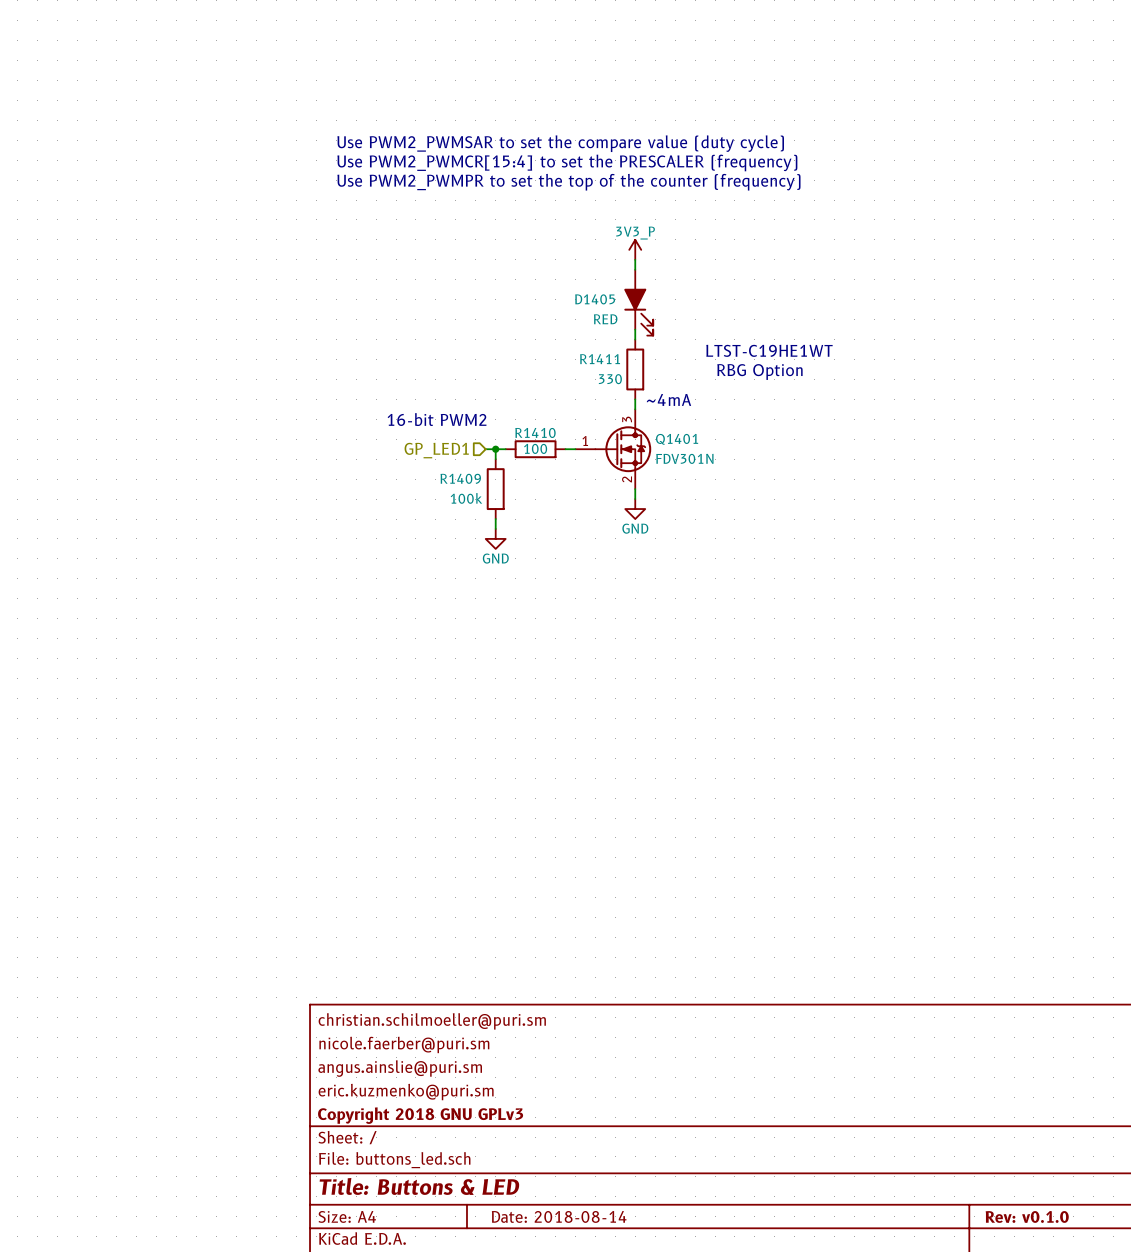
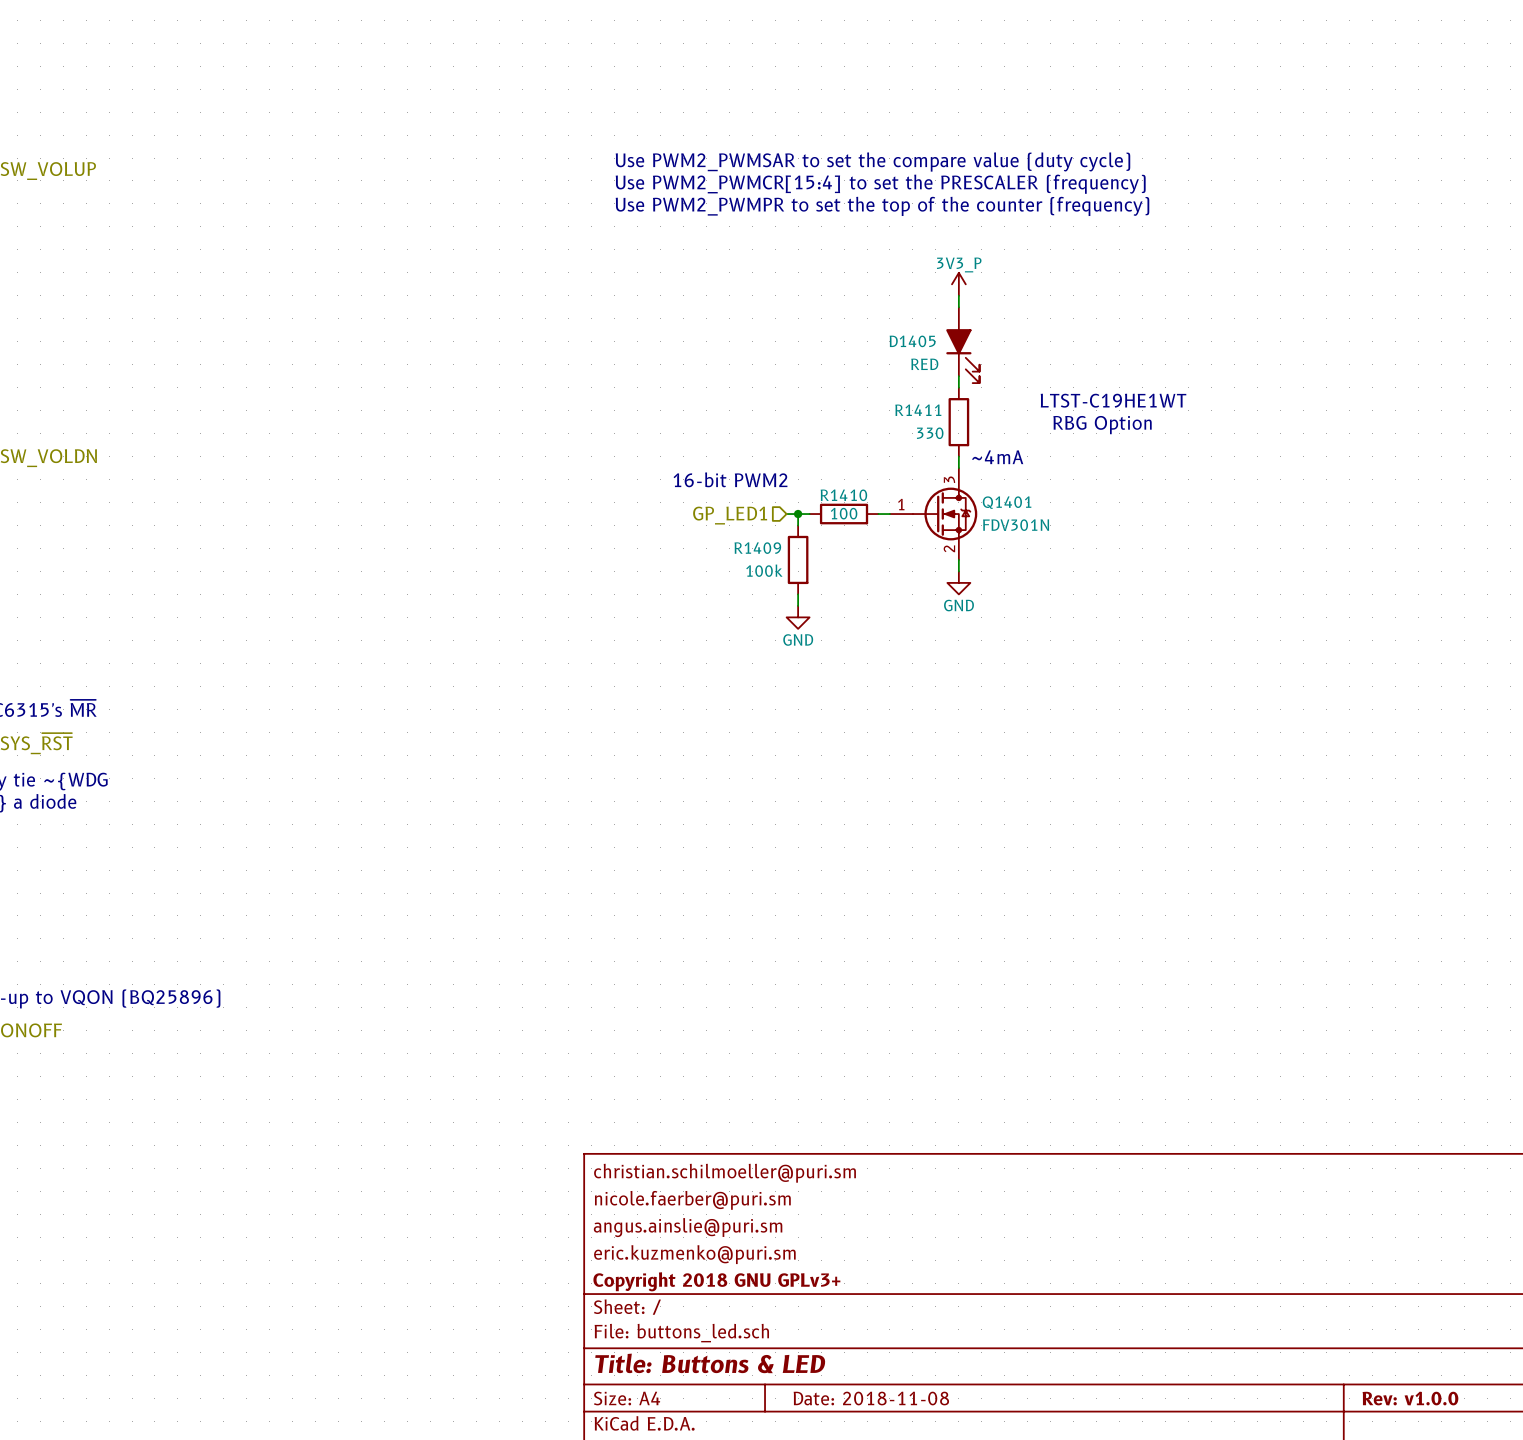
title block: Copyright 2018 GNU GPLv3 (420, 1115) -> Copyright 2018 GNU GPLv3+ (716, 1281)
title block: Date: 2018-08-14 (559, 1216) -> Date: 2018-11-08 (871, 1398)
title block: Rev: v0.1.0 (1027, 1216) -> Rev: v1.0.0 (1410, 1398)

